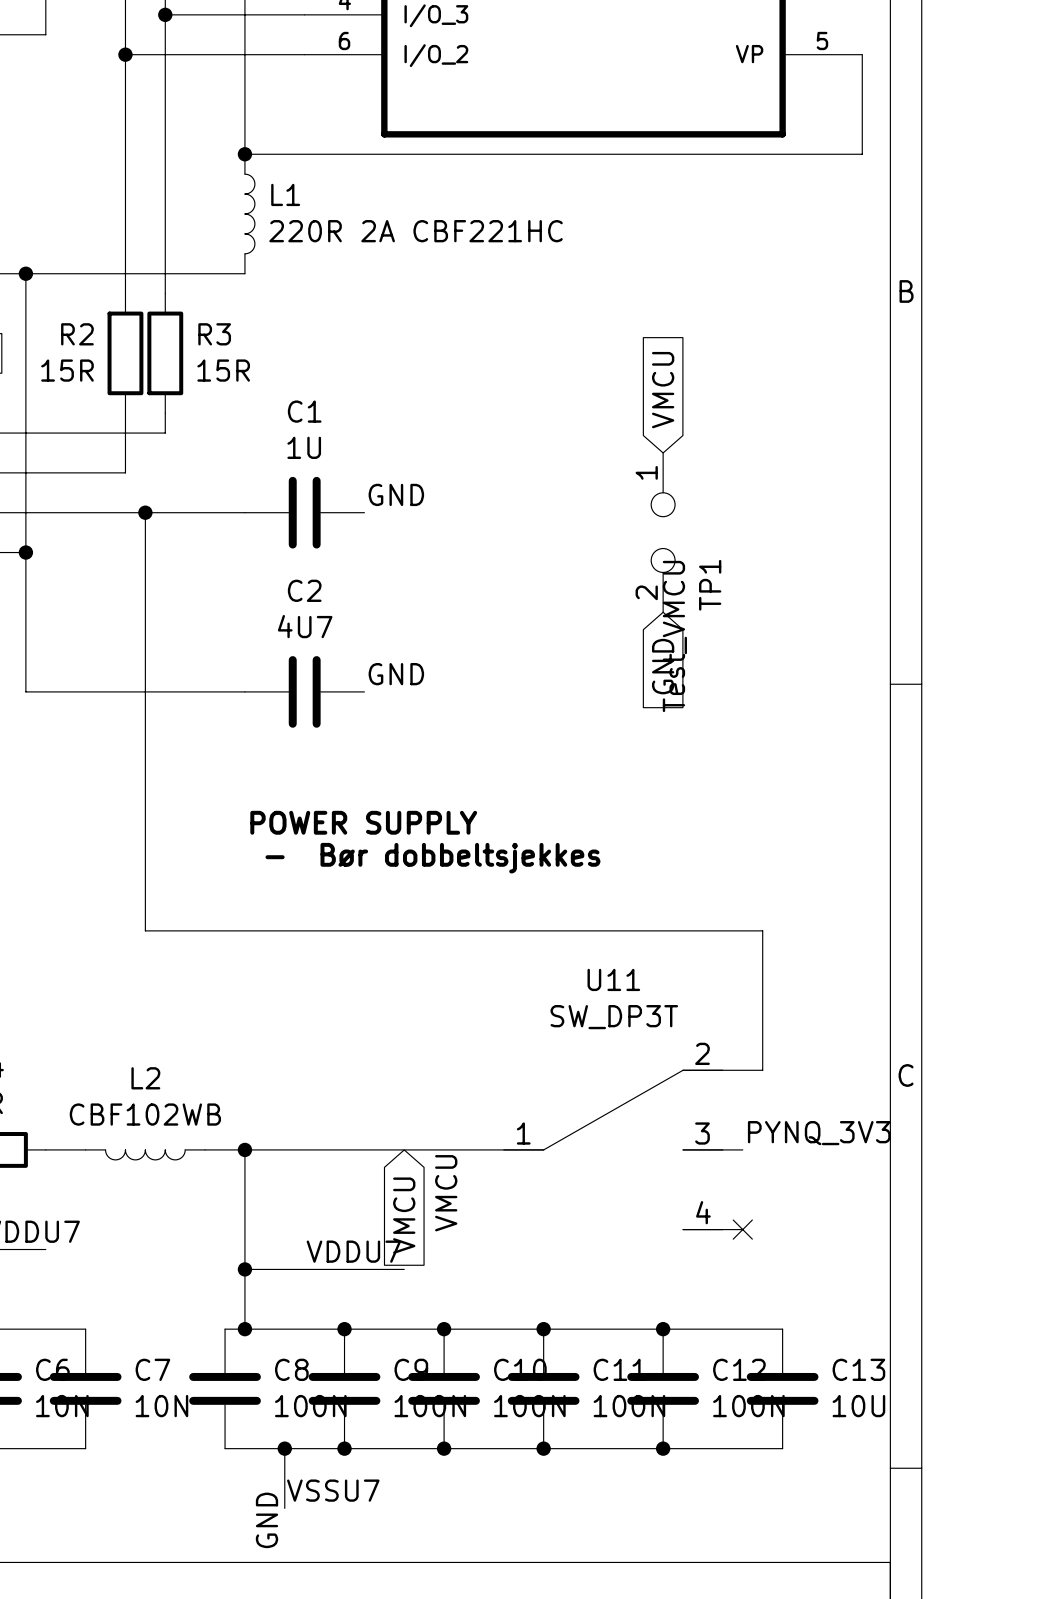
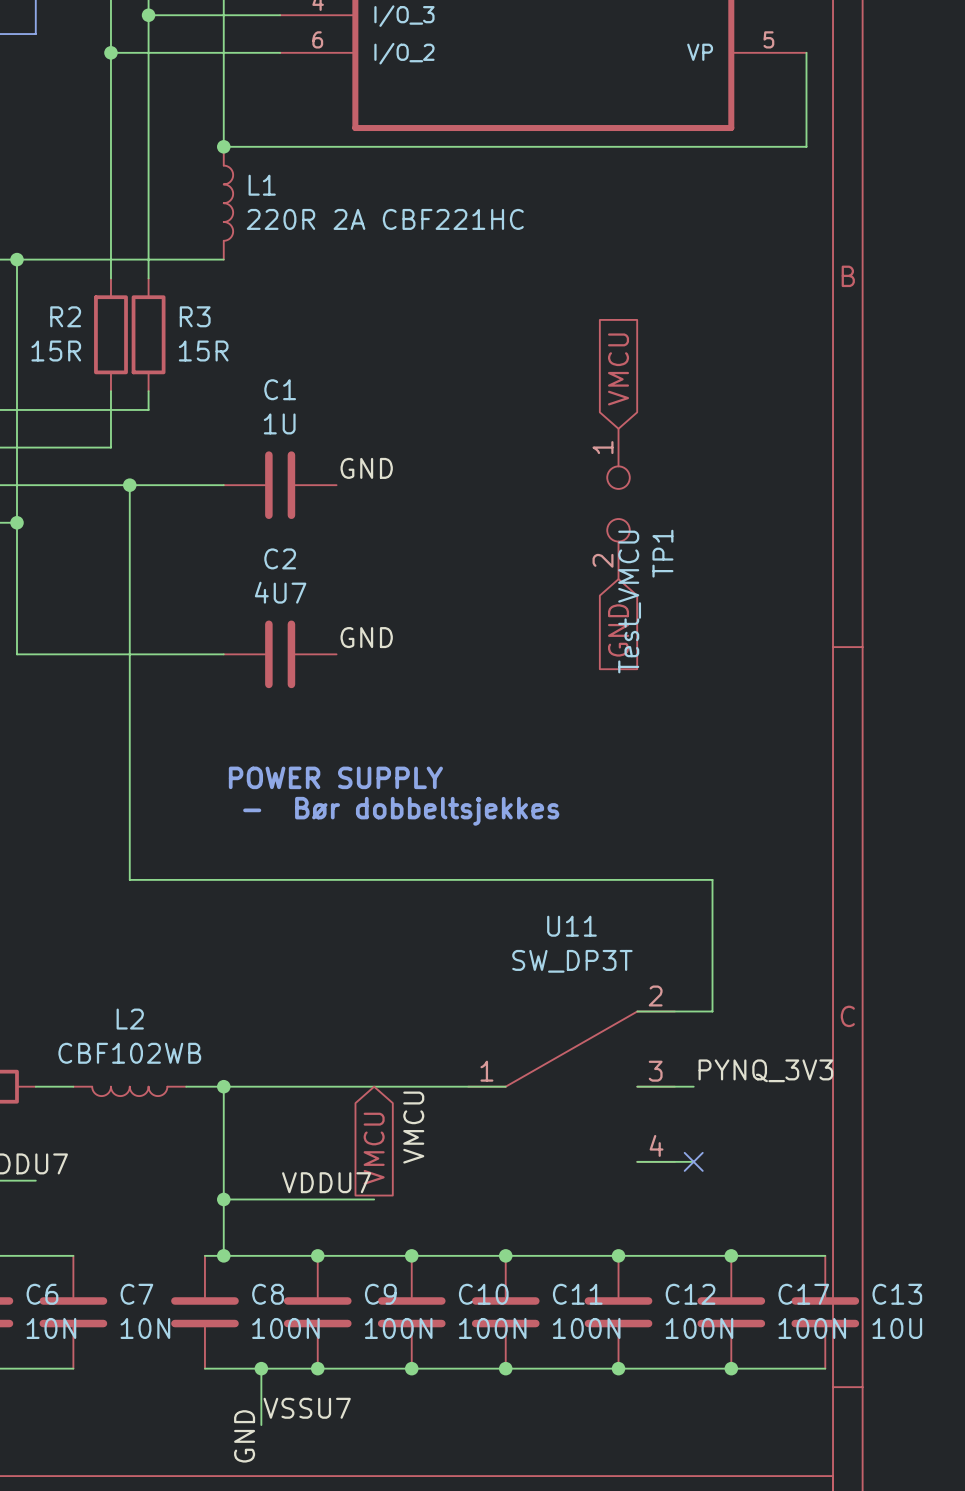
wire: none -> (731, 1255) (825, 1255)
junction: none -> (731, 1255)
C13 name: C13 (858, 1369) -> C17 (803, 1294)
C13: none -> 10U (825, 1312)
C13 value: 10U (858, 1406) -> 100N (812, 1328)
wire: none -> (731, 1368) (825, 1368)
junction: none -> (731, 1368)

